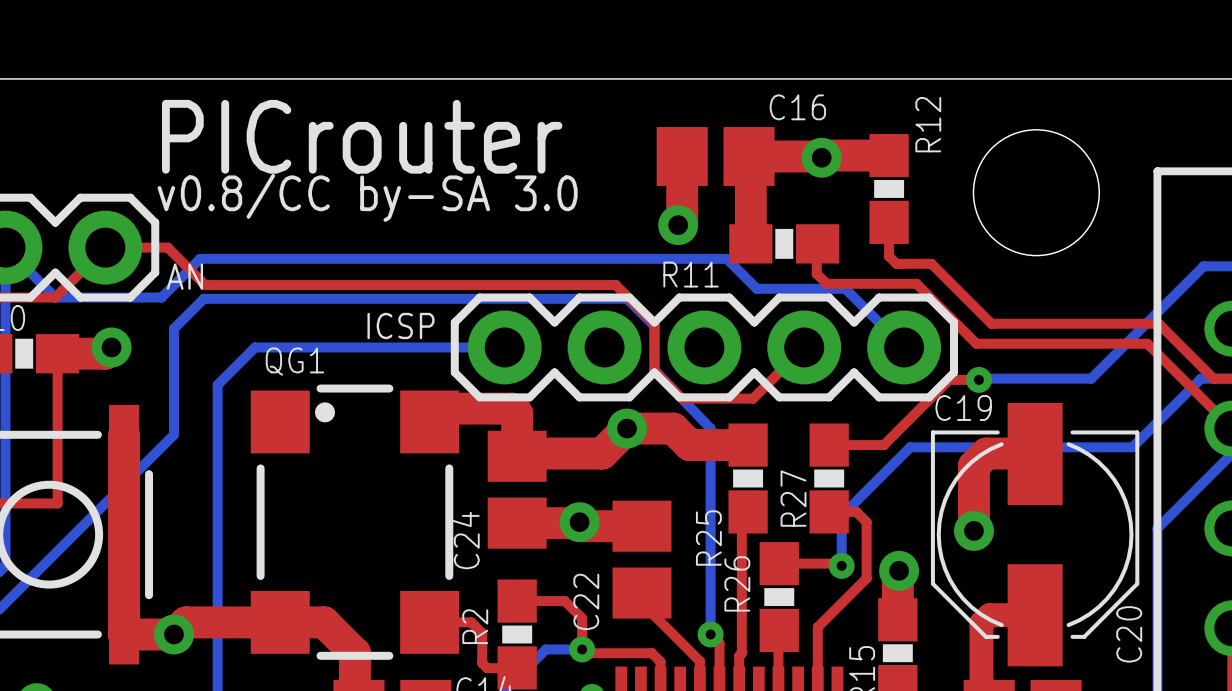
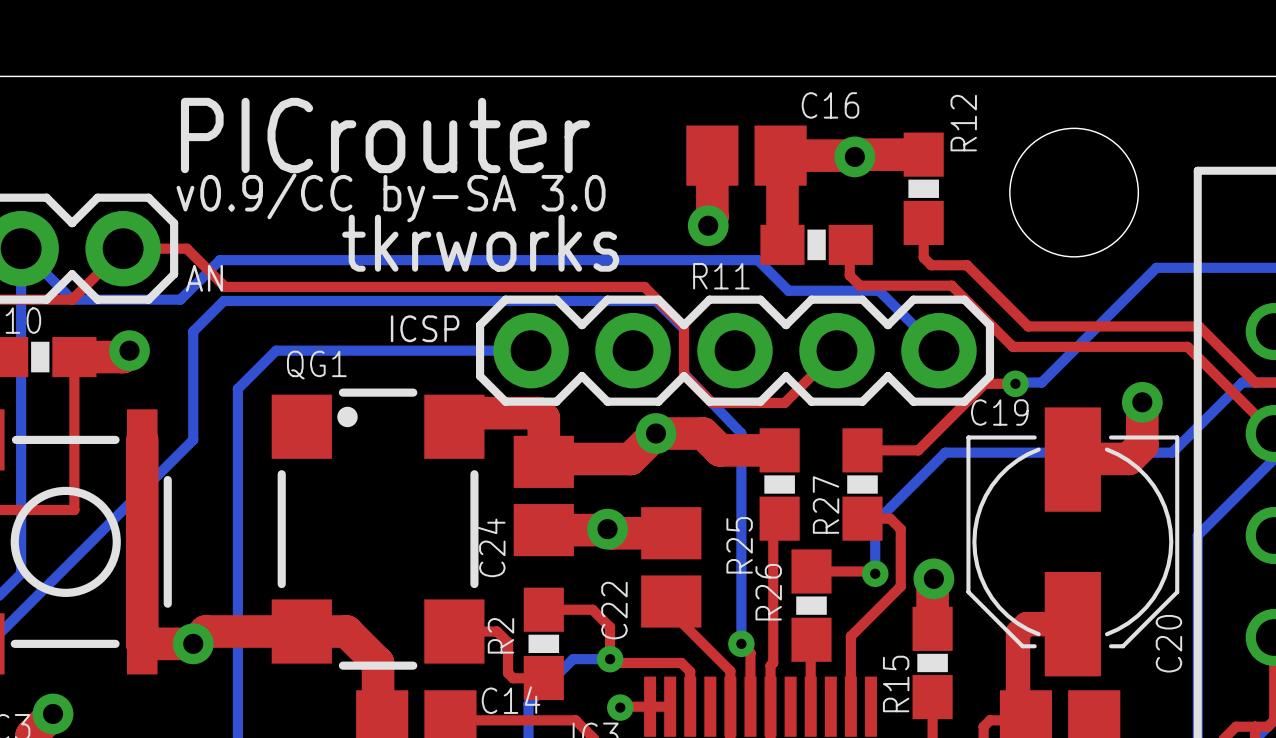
text: v0.8/CC by-SA 3.0 (367, 197) -> v0.9/CC by-SA 3.0 (391, 197)
text: none -> tkrworks (480, 243)
bottom track: (1203, 266) (1091, 378) (1004, 378) -> (1244, 267) (1156, 267) (1041, 382)
top track: (1034, 453) (986, 453) (973, 466) (973, 530) -> (1072, 459) (1128, 458) (1142, 445) (1142, 402)
via position: (973, 530) -> (1142, 402)

